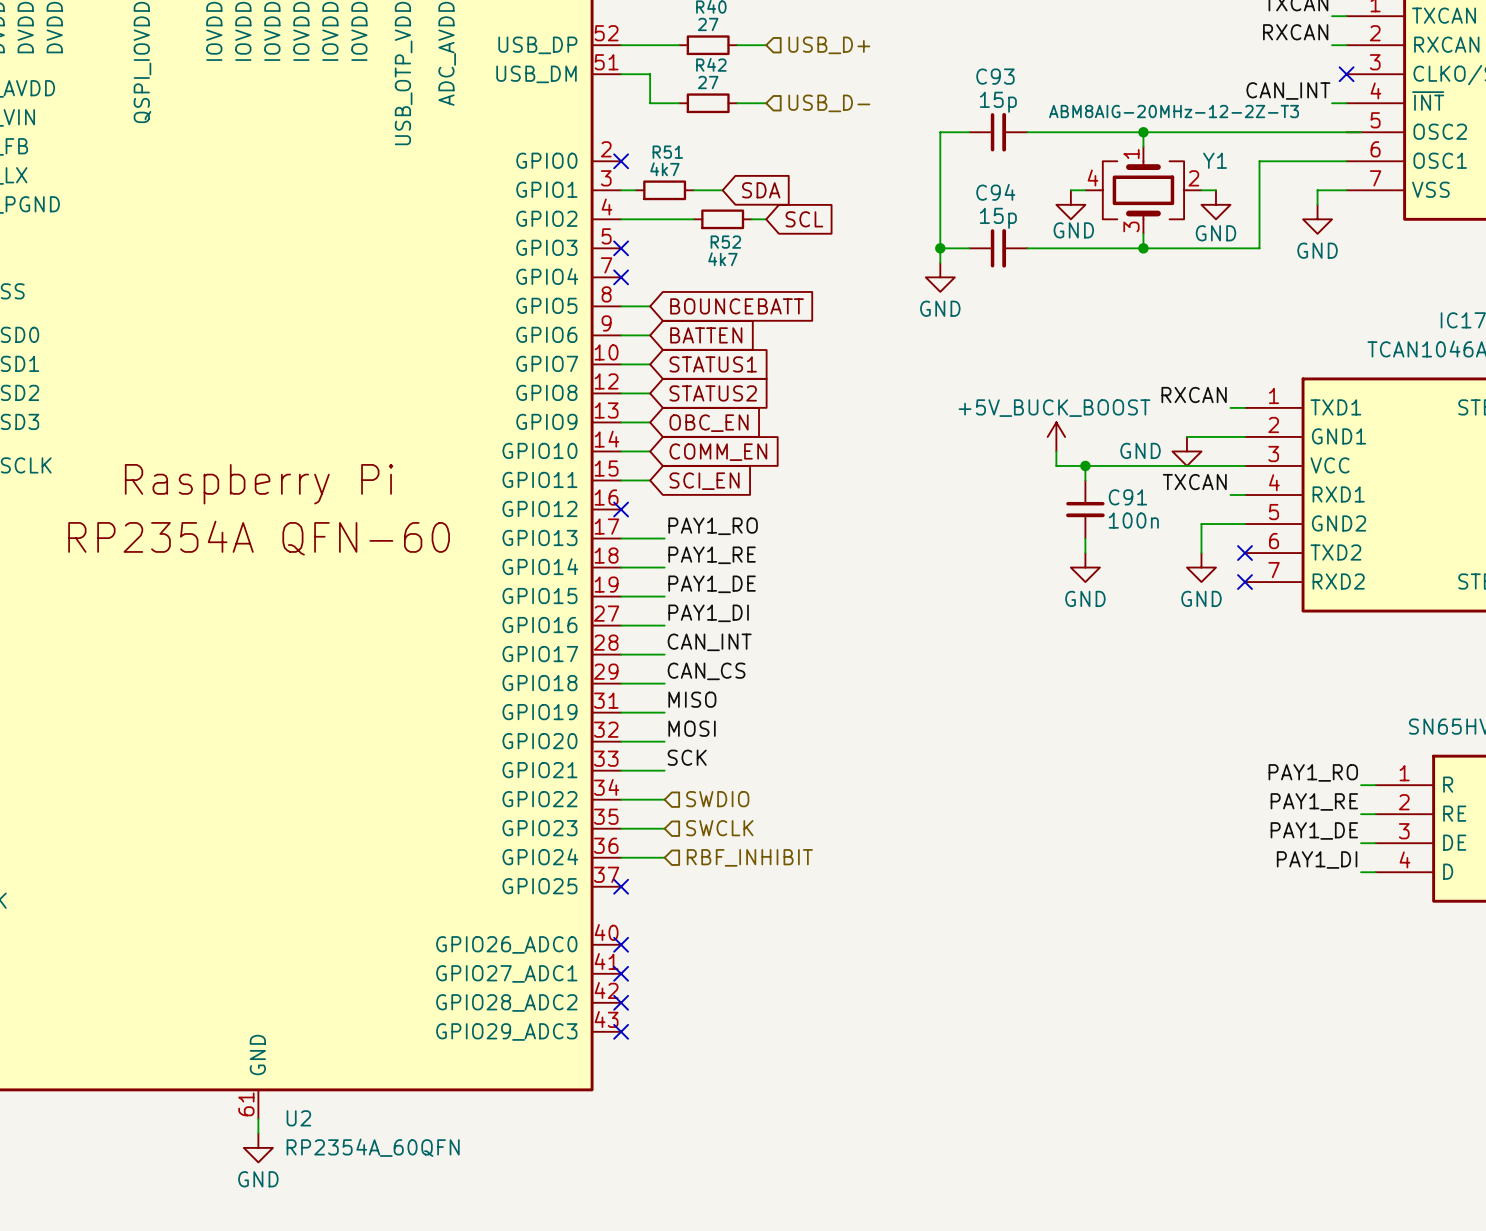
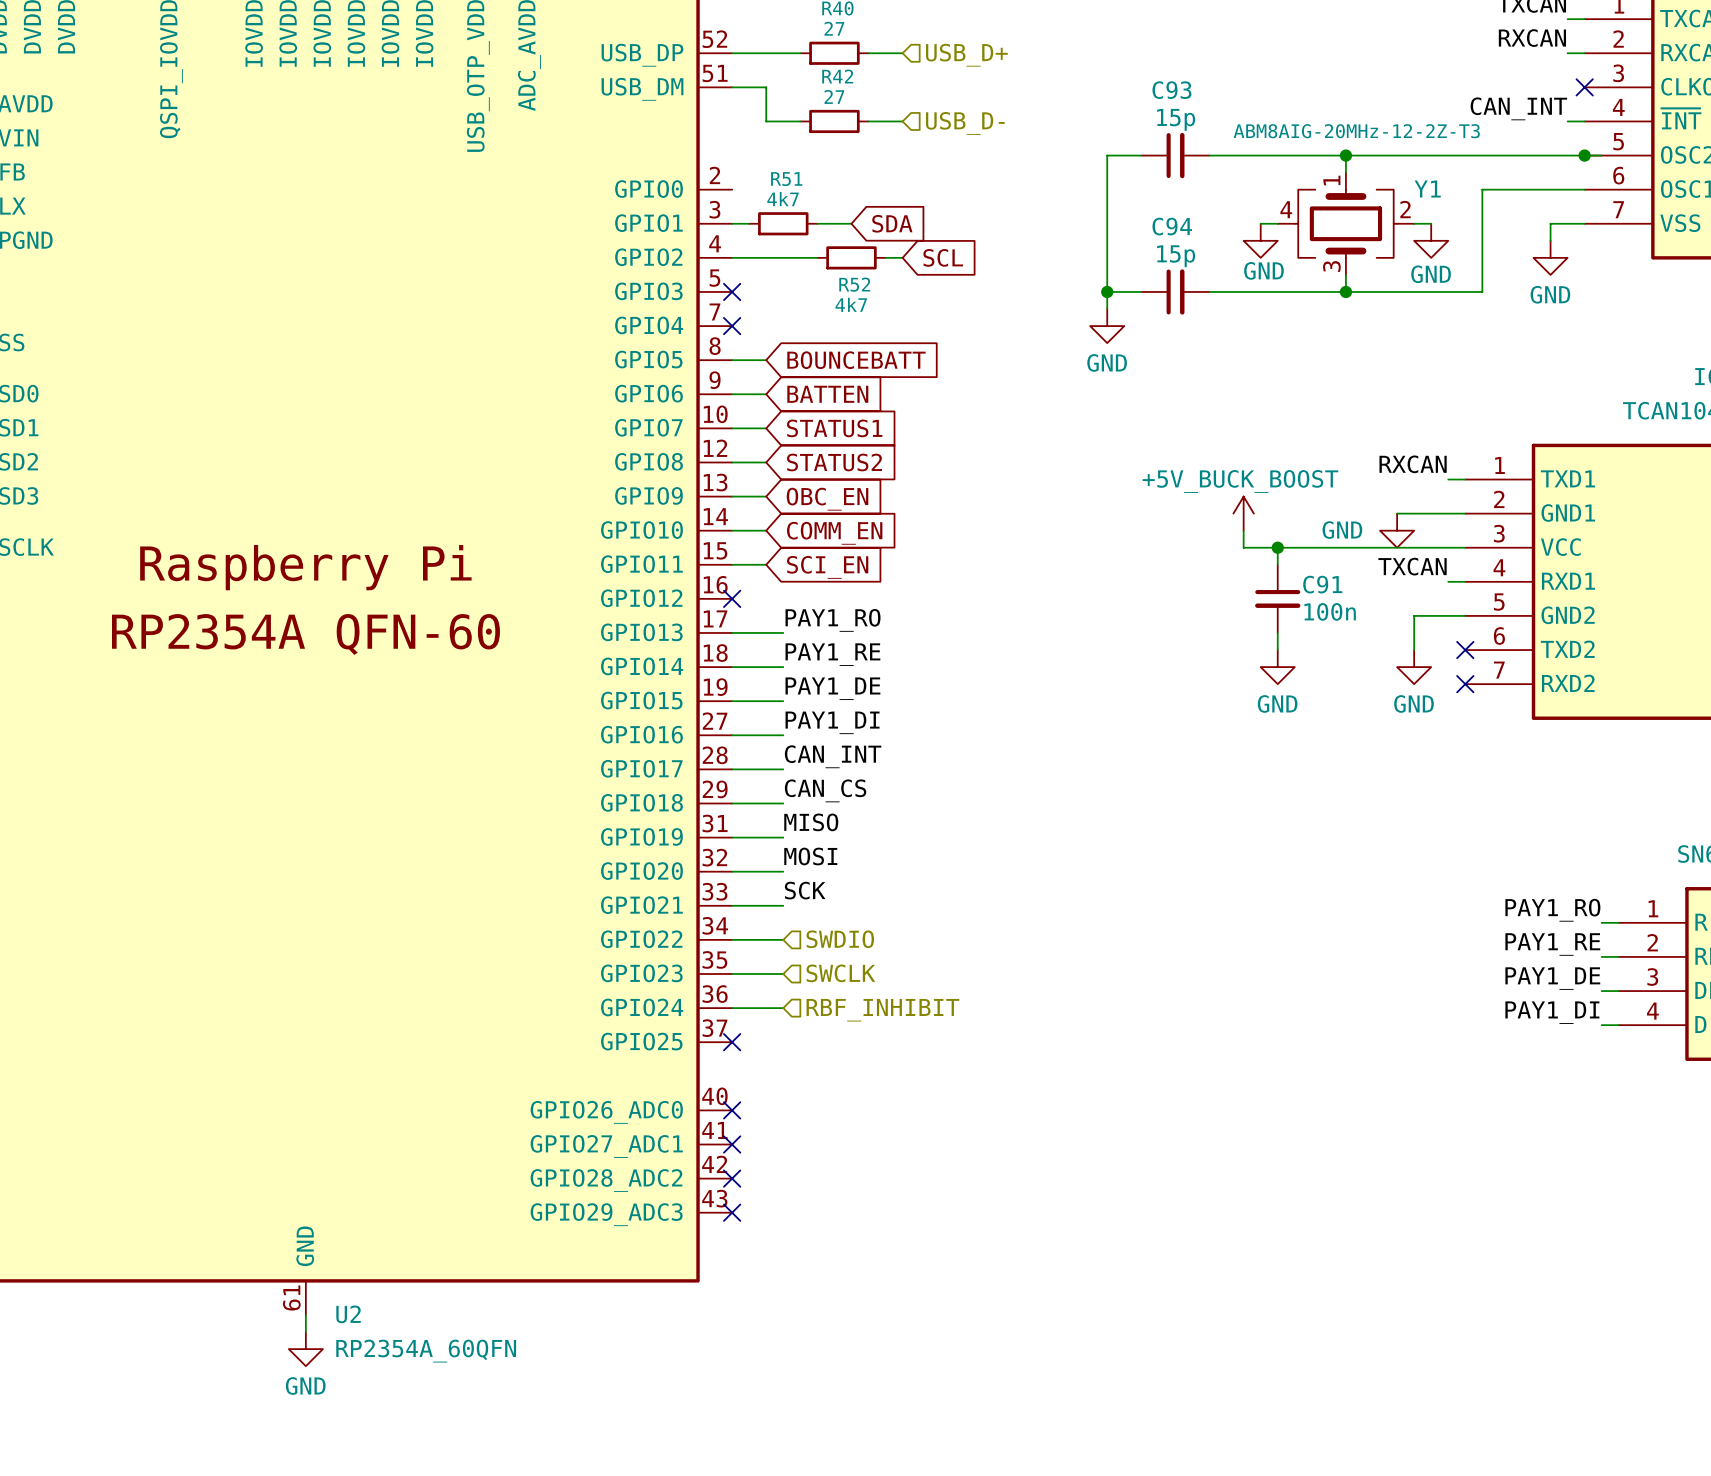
junction: none -> (1584, 155)
no-connect mark: (621, 161) -> none

